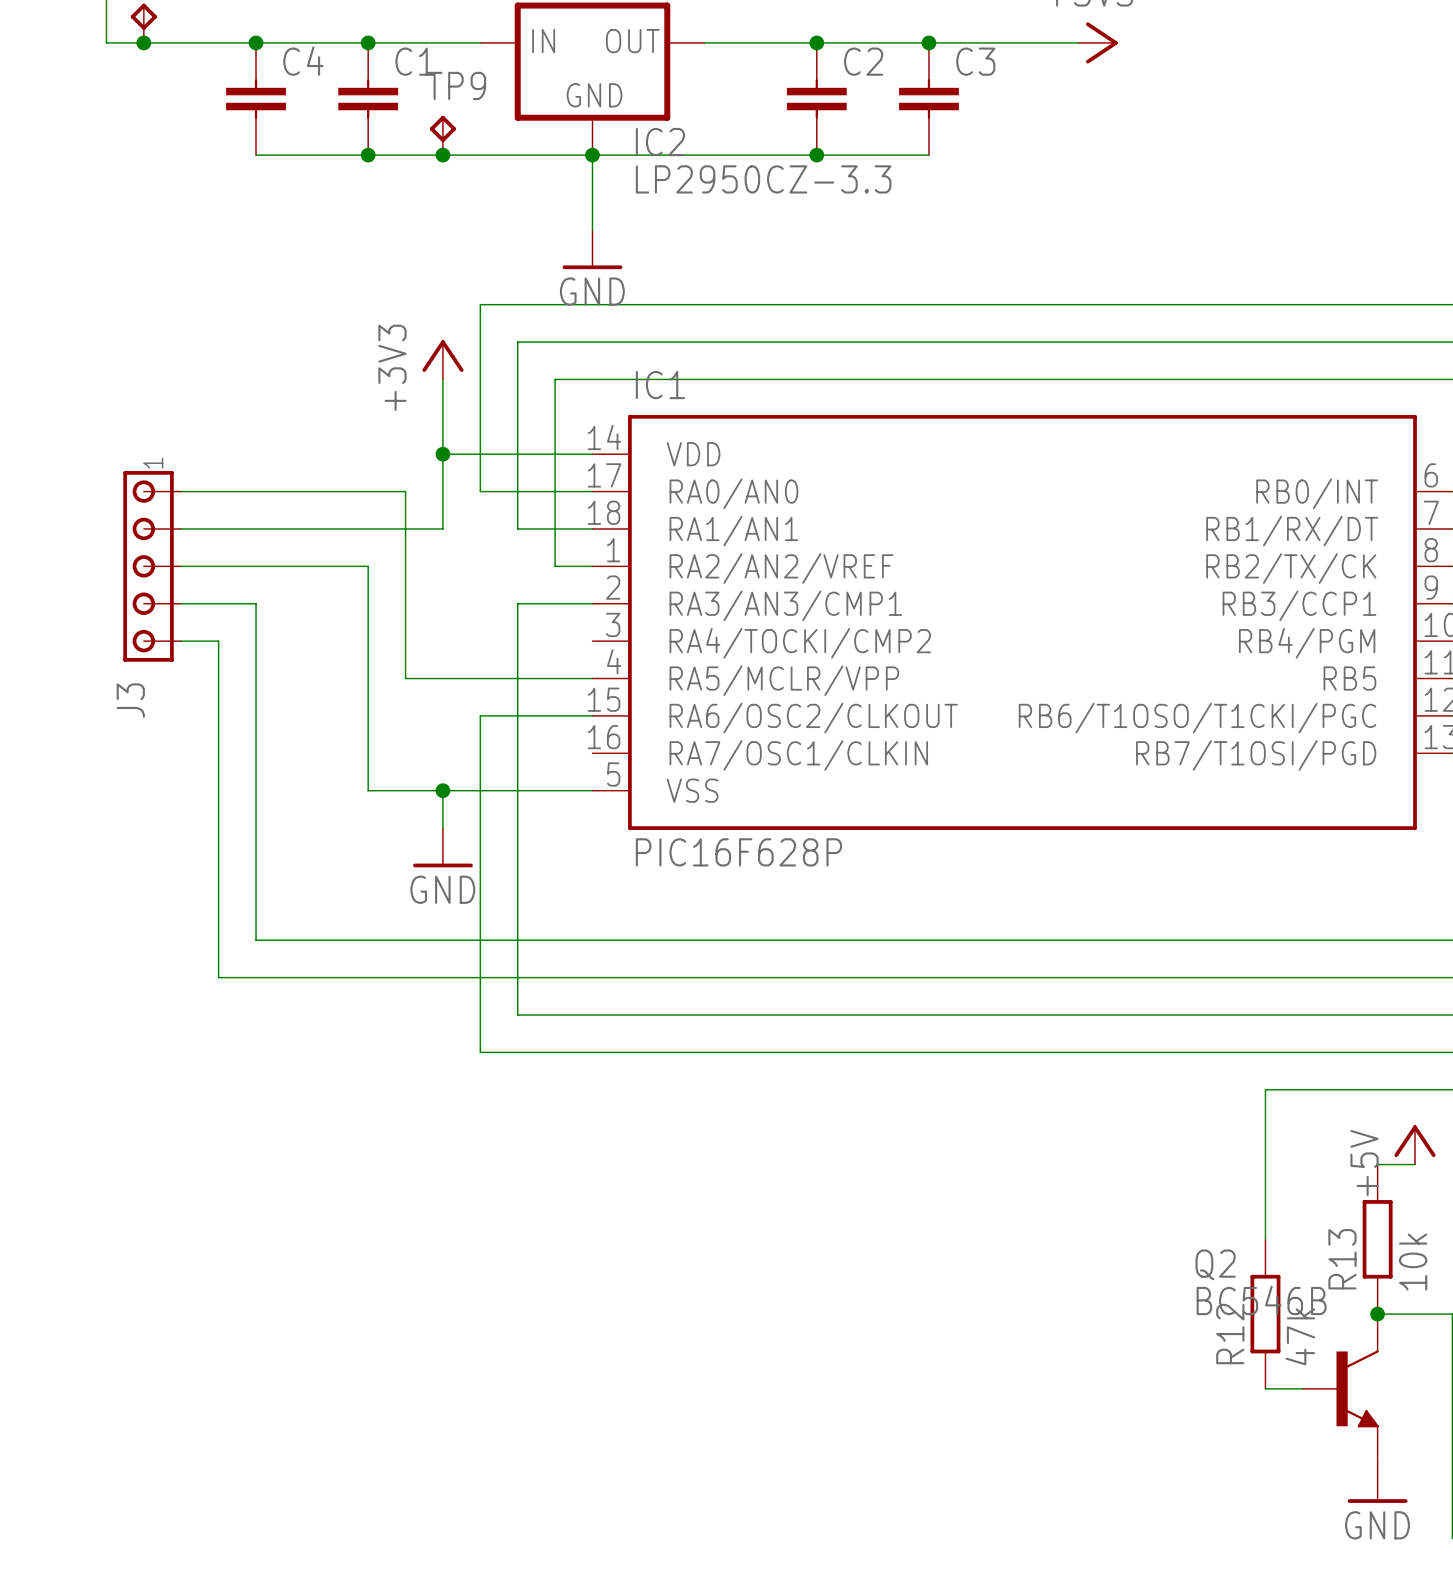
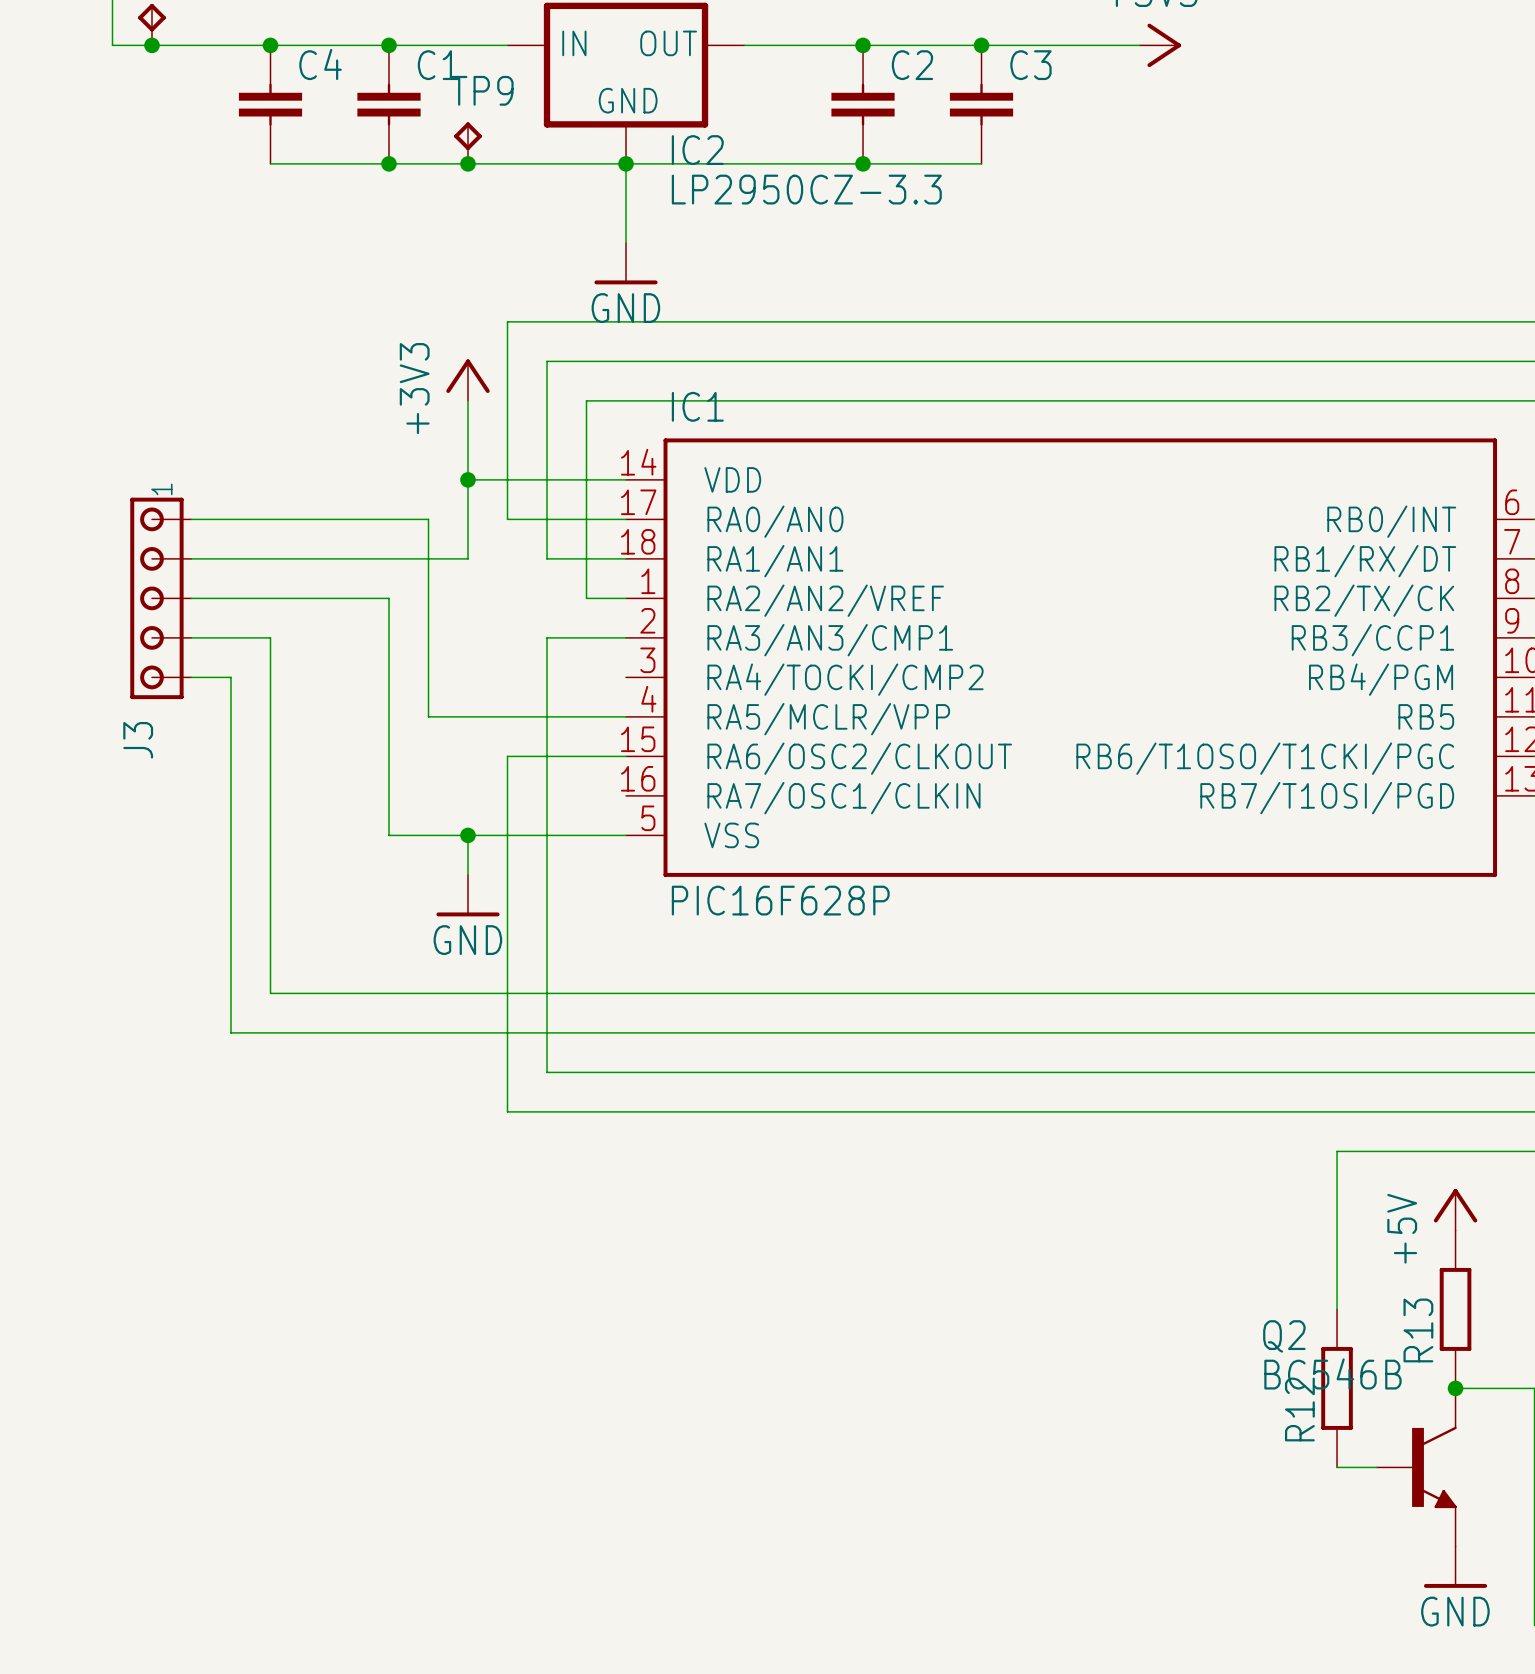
power symbol position: +5V (1415, 1144) -> +5V (1455, 1209)
wire: (1377, 1164) (1415, 1164) -> none
R13 value: 10k (1413, 1262) -> none
R12 value: 47k (1300, 1336) -> none

